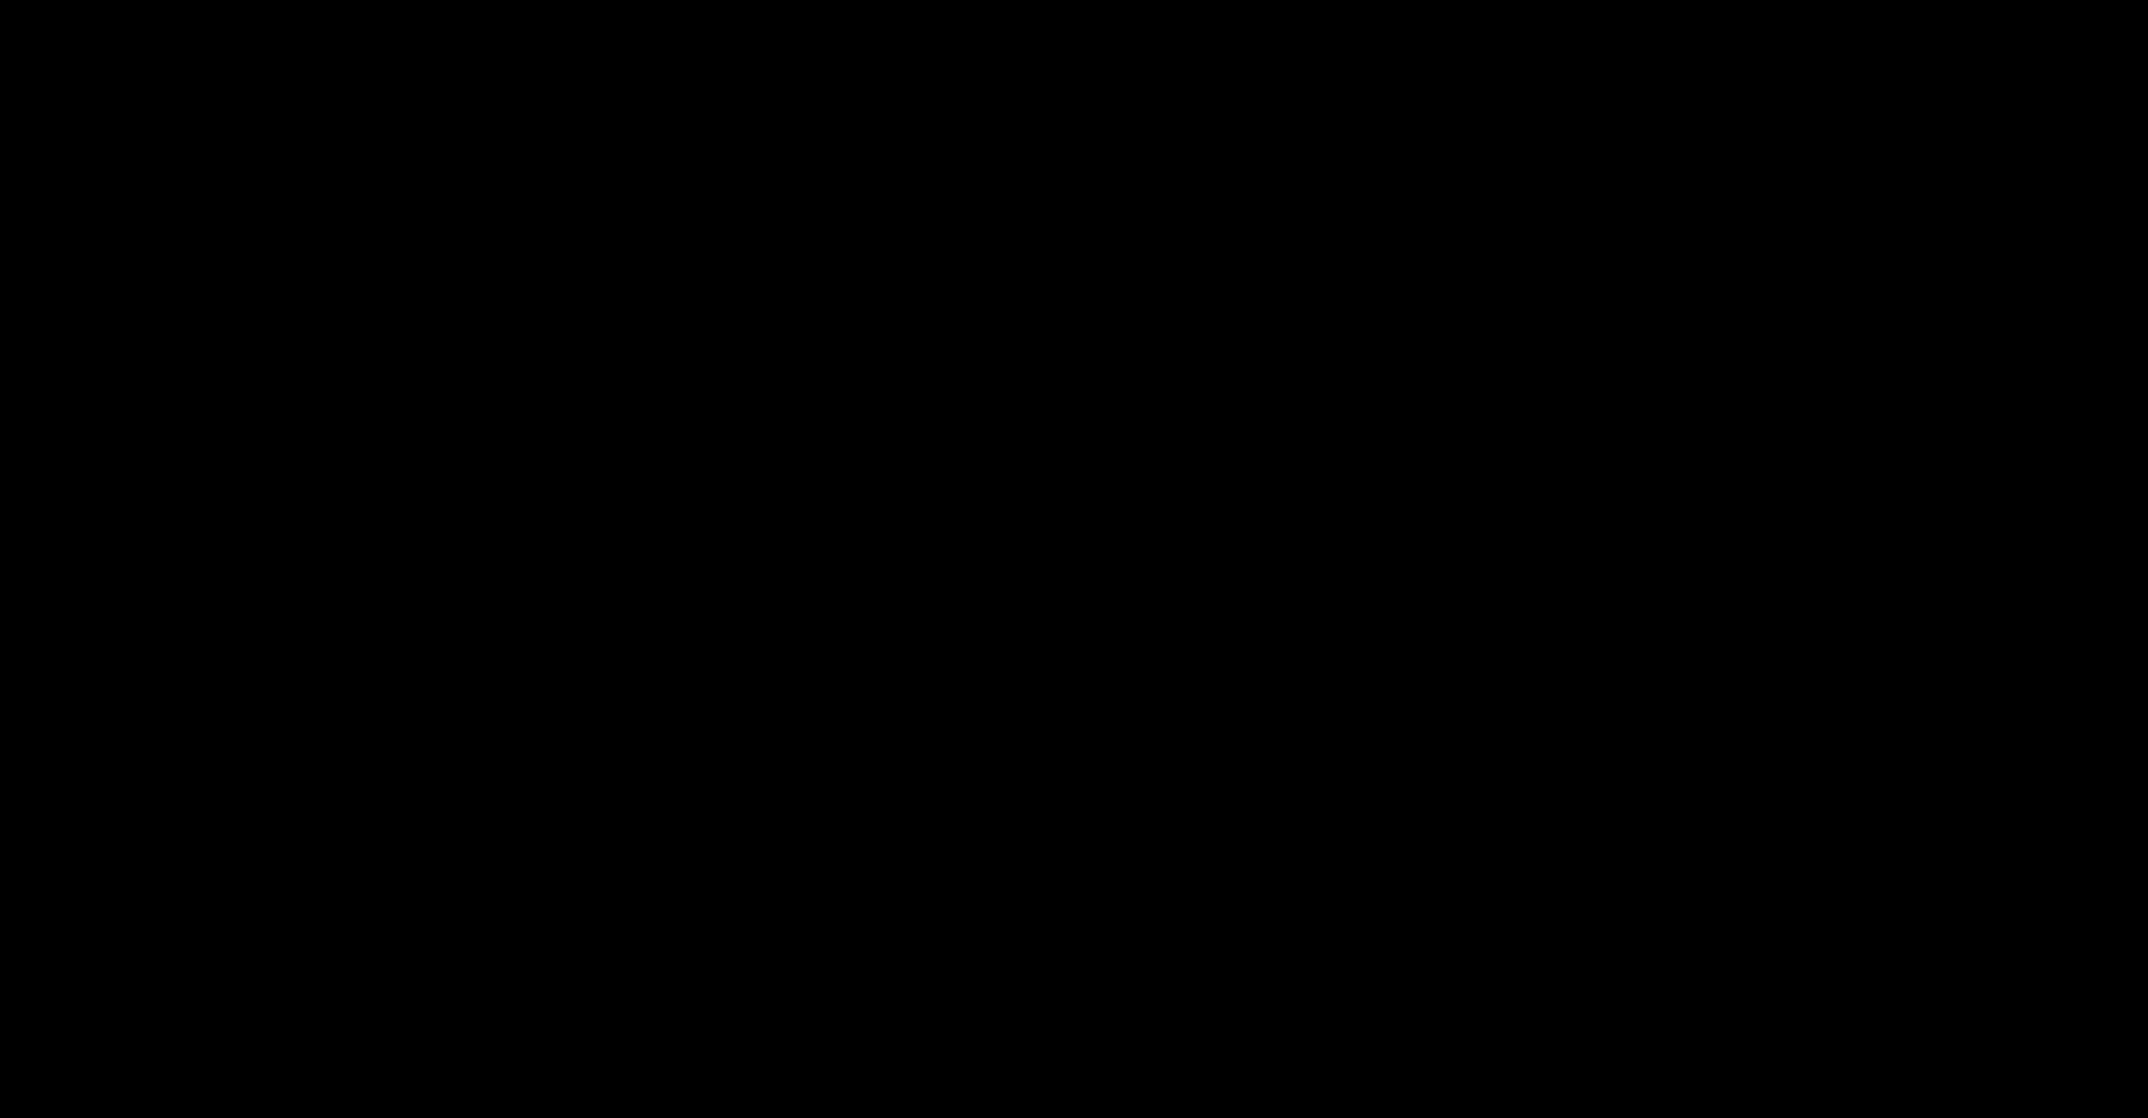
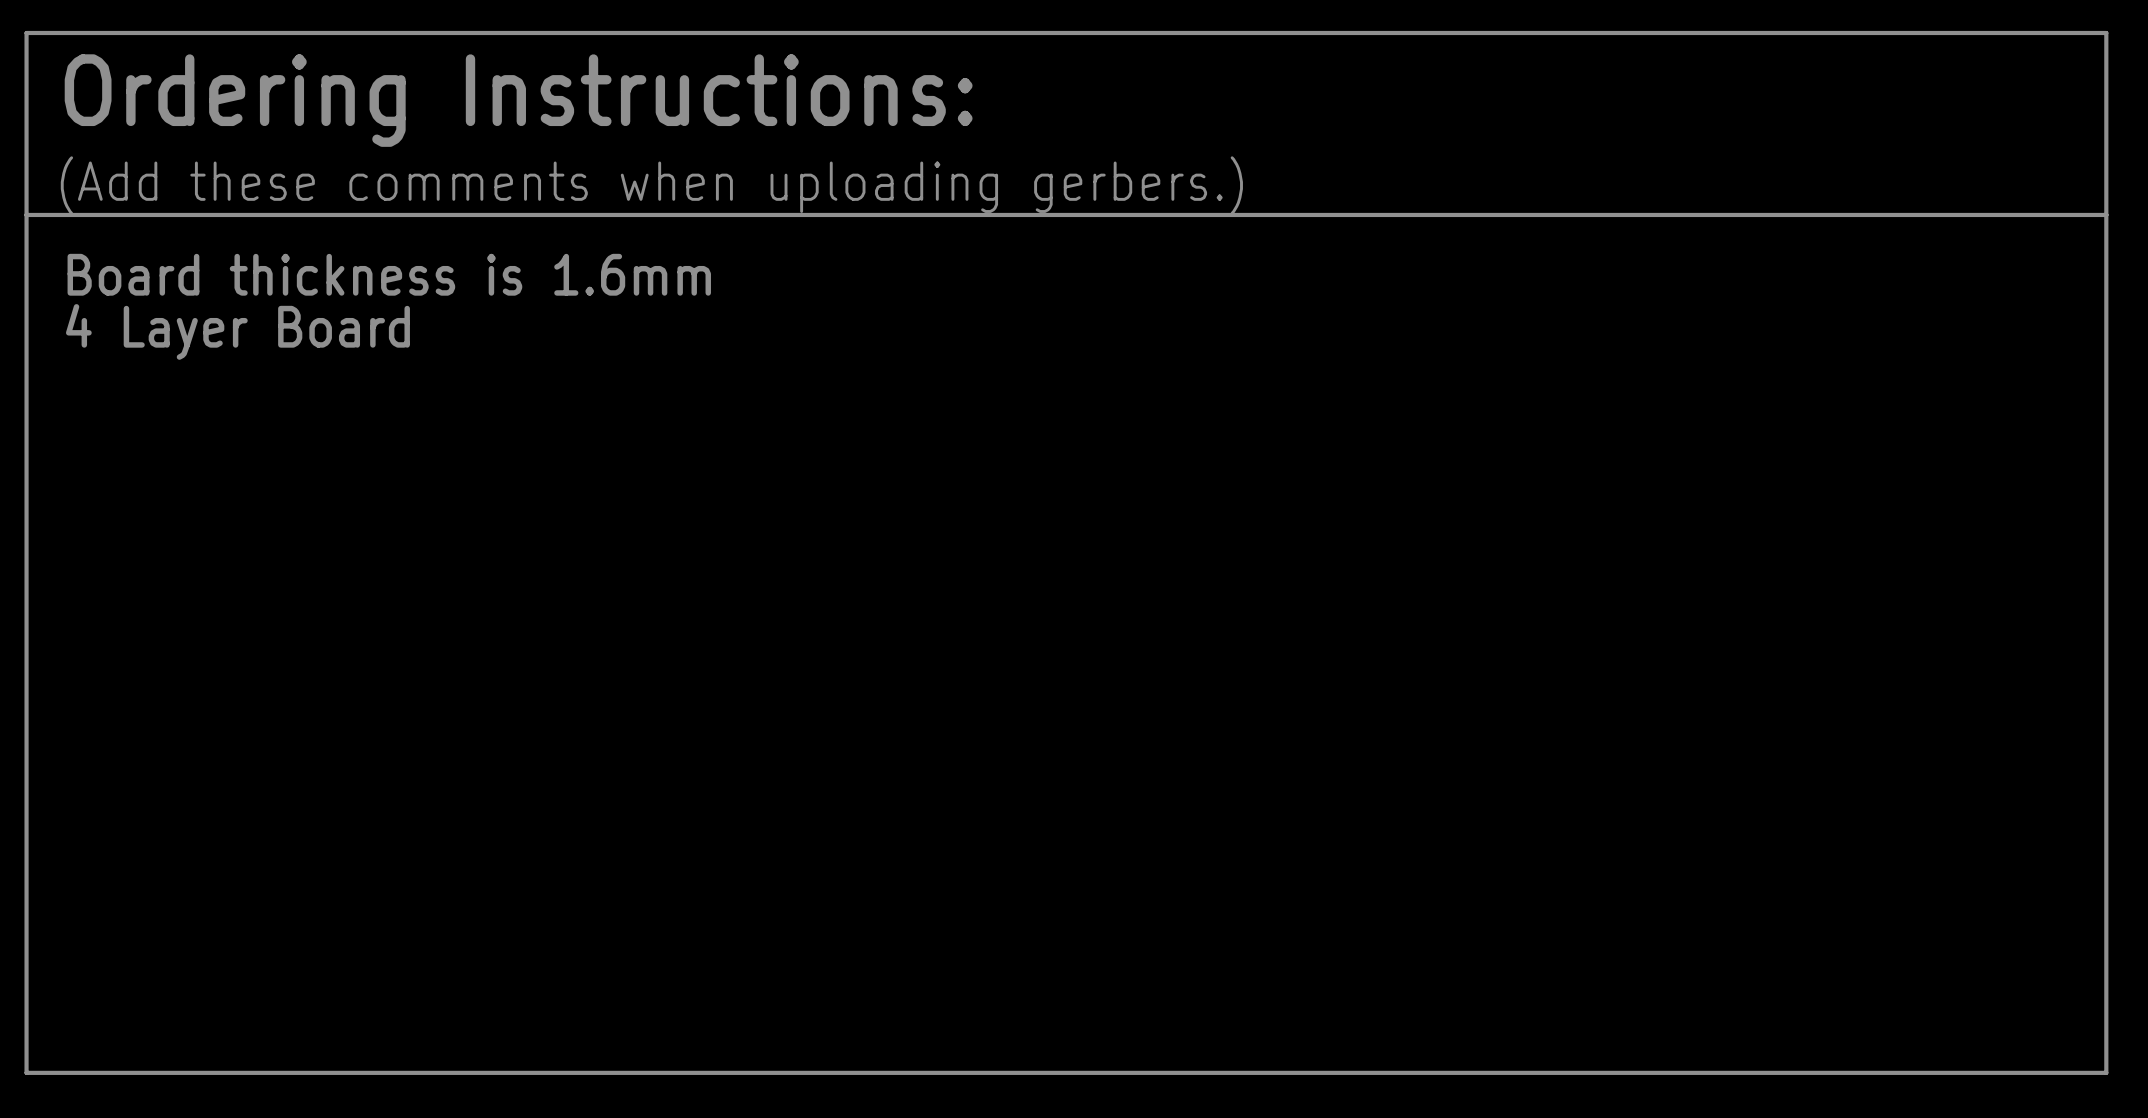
drawing: none -> [24, 30, 2109, 1075]
text: none -> Board thickness is 1.6mm (389, 274)
text: none -> 4 Layer Board (237, 331)

